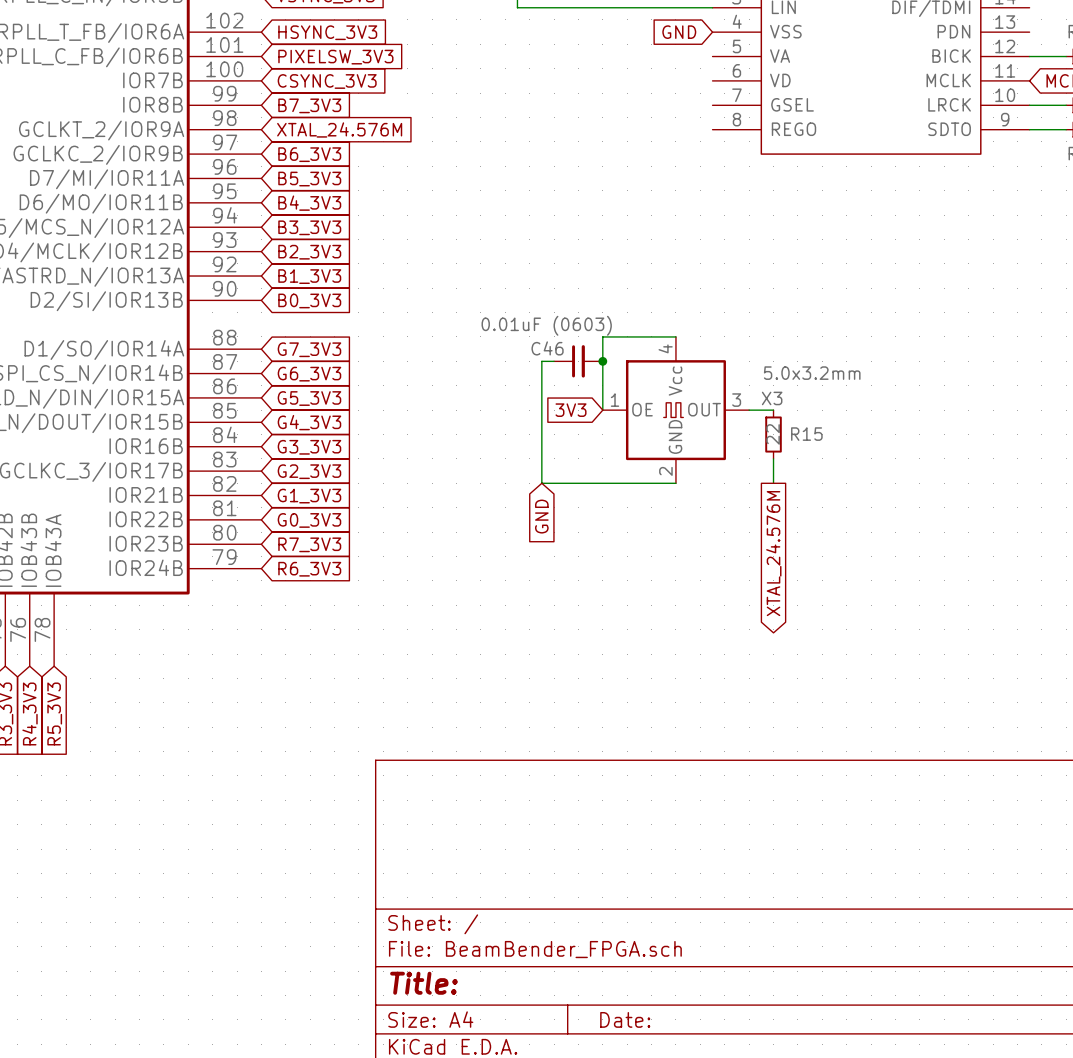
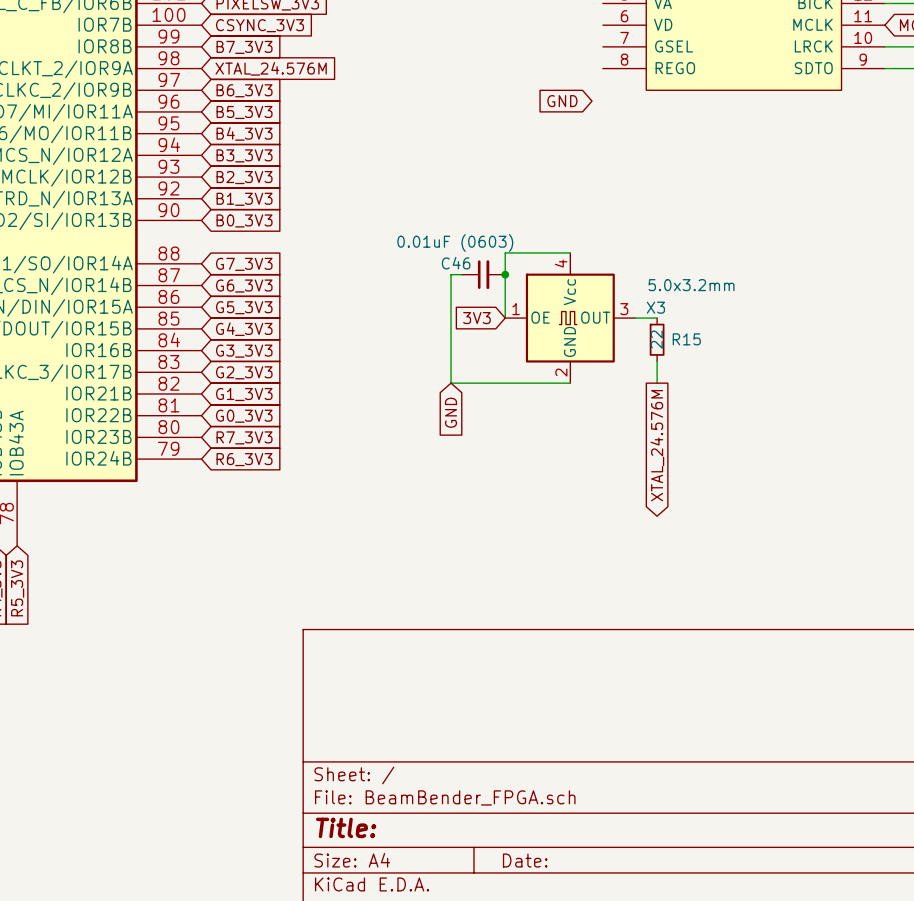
global label: none -> GND (562, 101)

